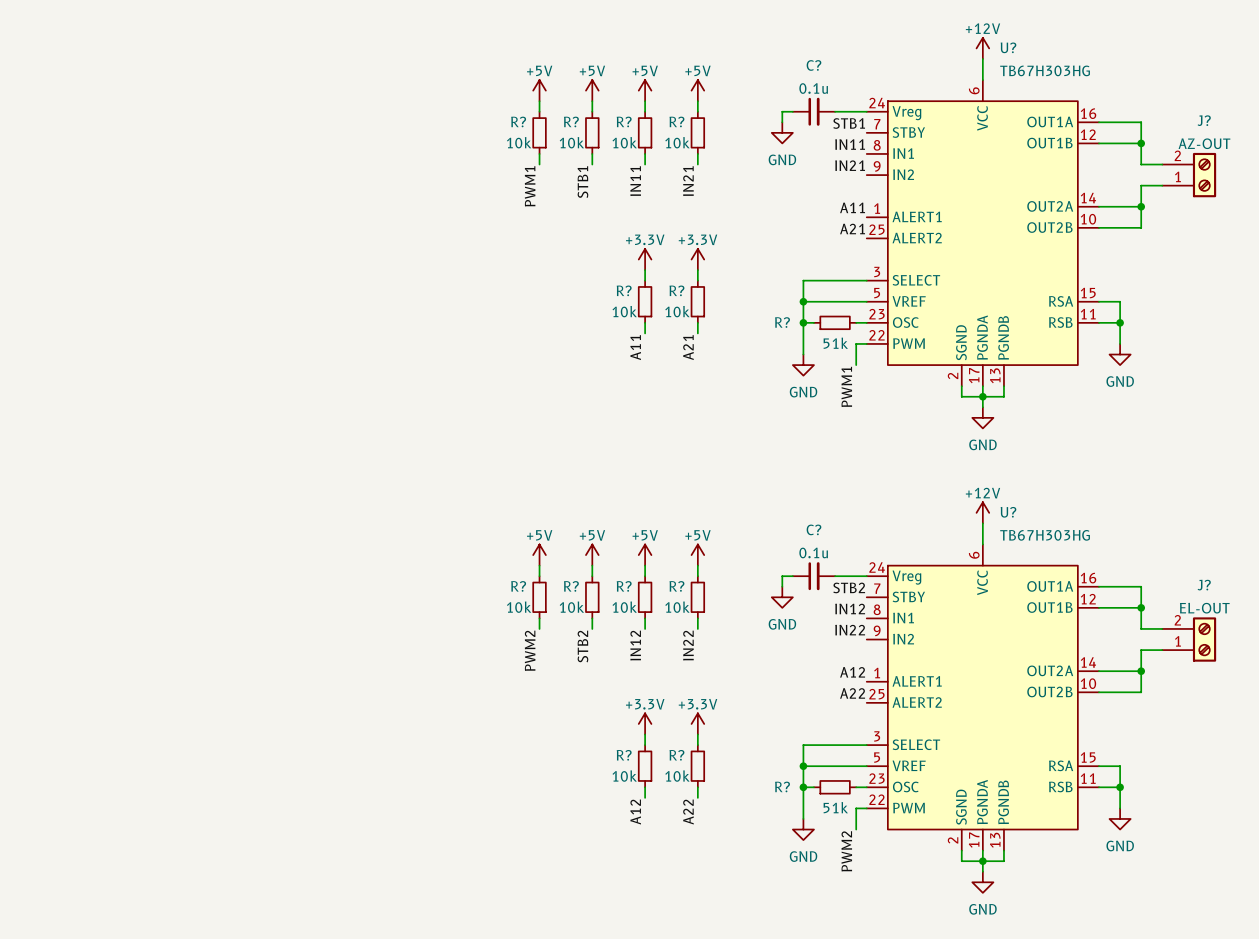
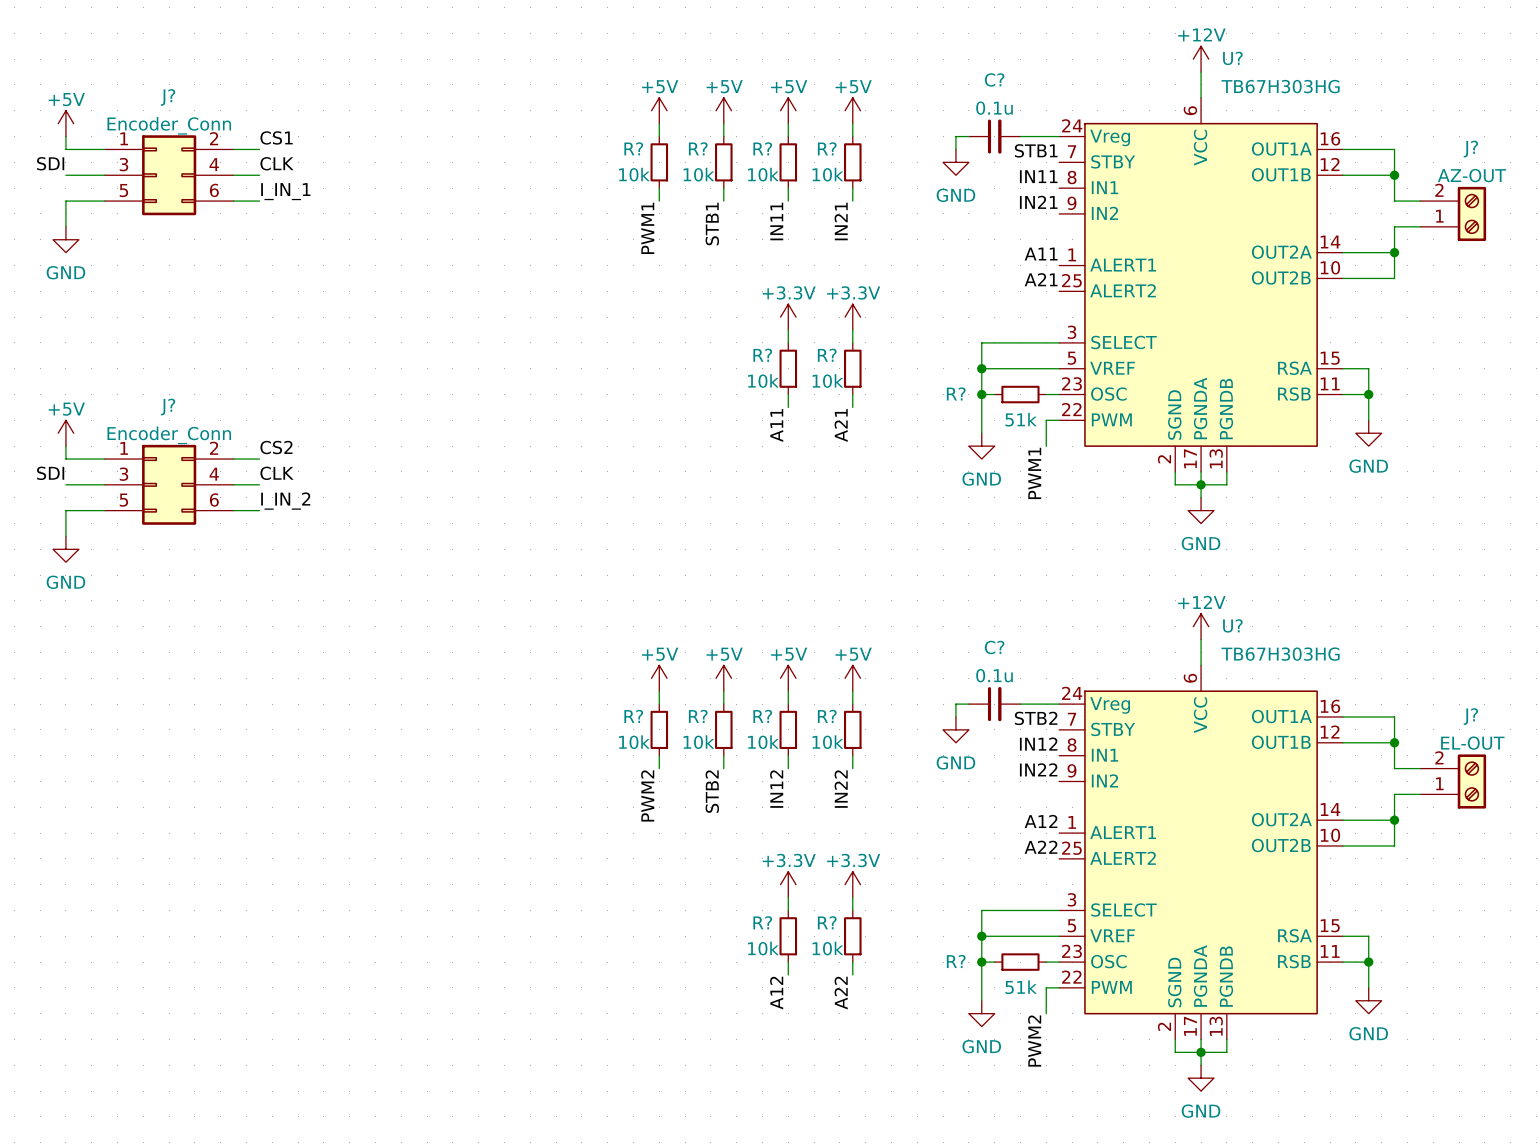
power symbol: none -> +5V (65, 123)
wire: none -> (65, 136) (65, 149) (104, 149)
label: none -> CS1 (276, 137)
wire: none -> (233, 149) (259, 149)
label: none -> SDI (50, 163)
label: none -> CLK (277, 163)
wire: none -> (65, 175) (104, 175)
J?: none -> Encoder_Conn (169, 175)
wire: none -> (233, 175) (259, 175)
label: none -> I_IN_1 (285, 191)
wire: none -> (104, 201) (65, 201) (65, 226)
wire: none -> (233, 201) (259, 201)
power symbol: none -> GND (65, 239)
power symbol: none -> +5V (65, 433)
wire: none -> (65, 446) (65, 459) (104, 459)
label: none -> CS2 (276, 447)
wire: none -> (233, 459) (259, 459)
label: none -> SDI (50, 473)
label: none -> CLK (277, 473)
wire: none -> (65, 484) (104, 484)
J?: none -> Encoder_Conn (169, 484)
wire: none -> (233, 484) (259, 484)
label: none -> I_IN_2 (285, 501)
wire: none -> (104, 510) (65, 510) (65, 536)
wire: none -> (233, 510) (259, 510)
power symbol: none -> GND (65, 549)

